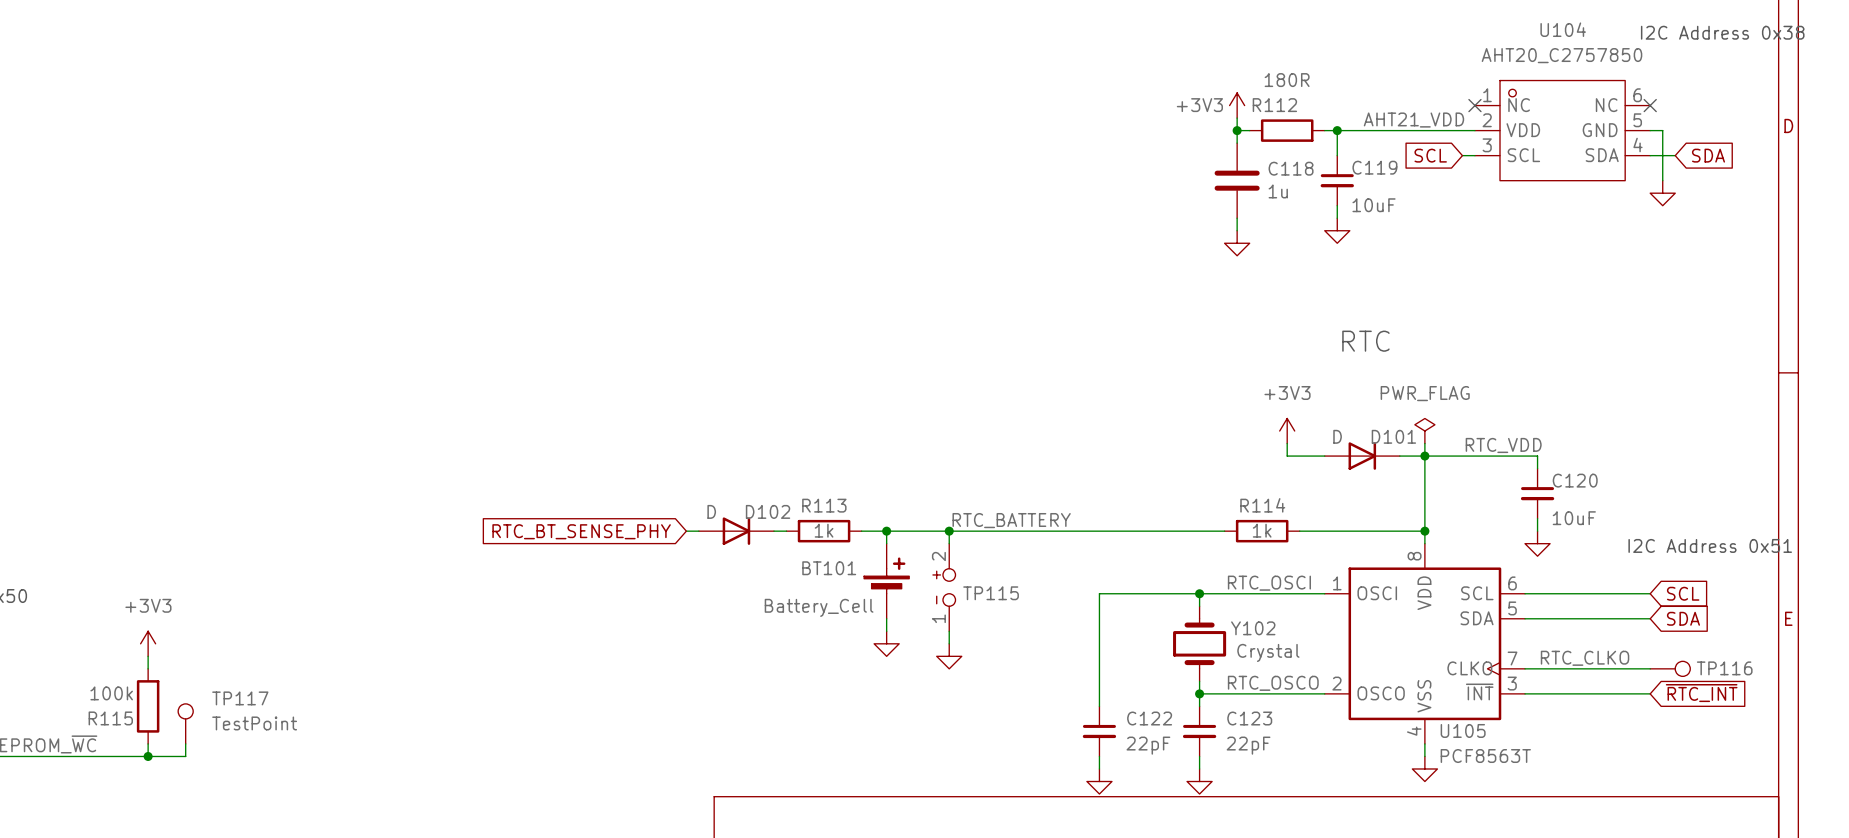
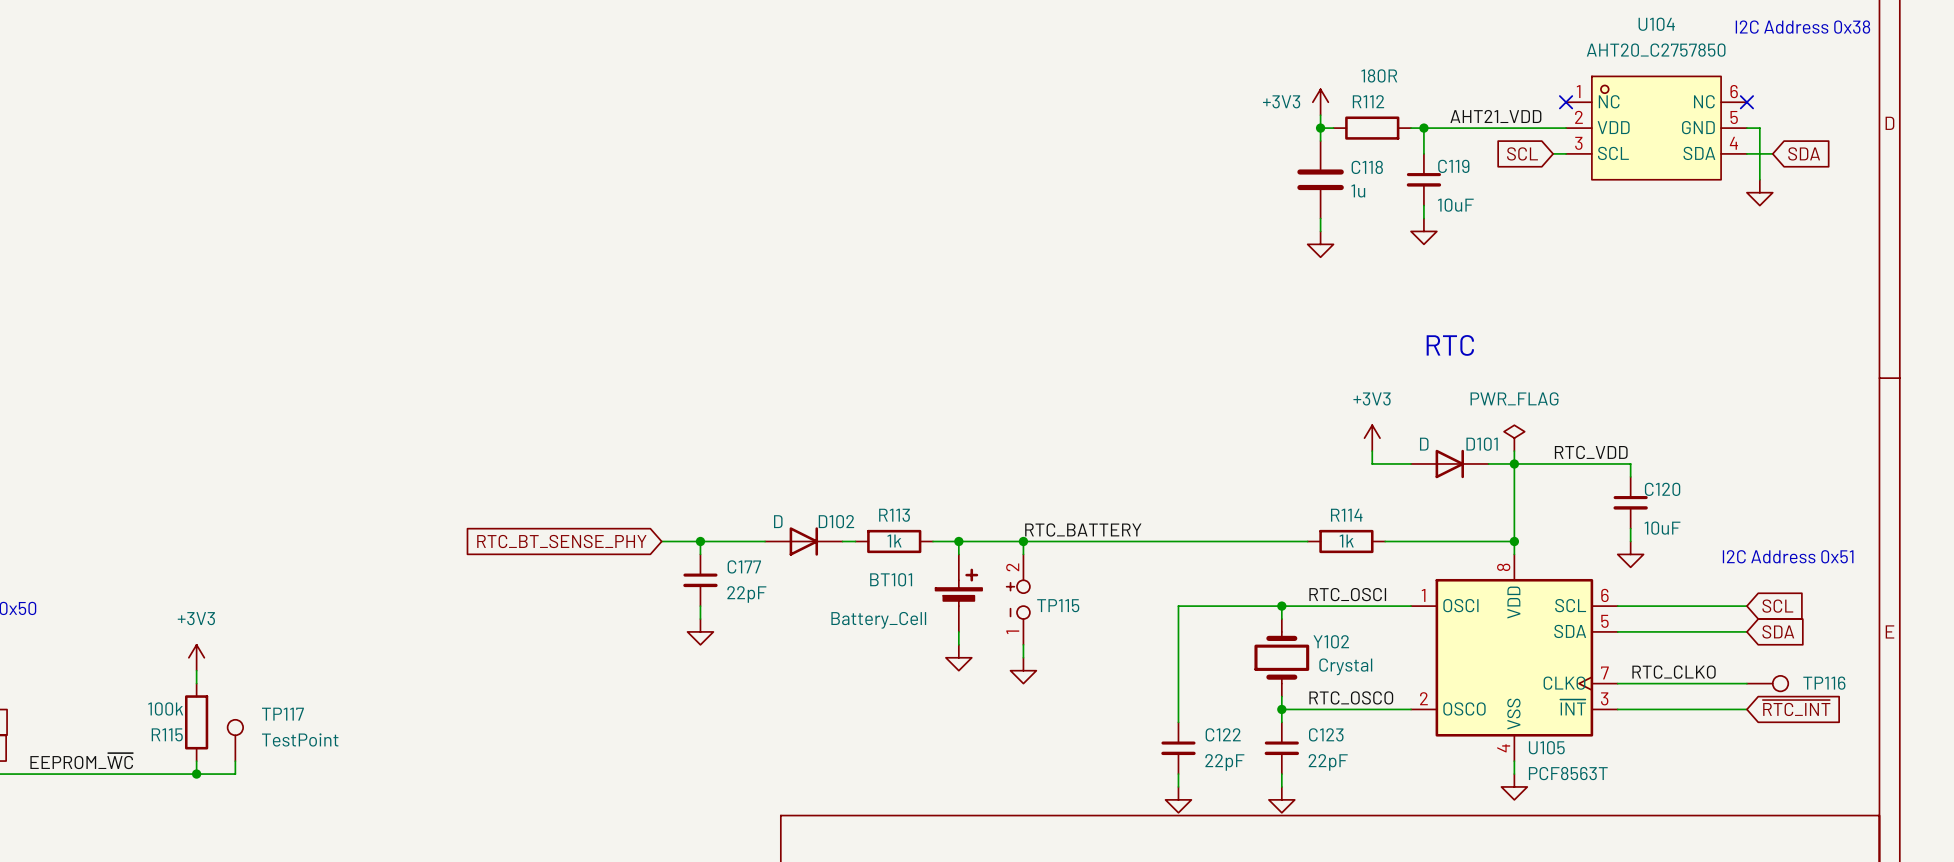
global label position: RTC_BT_SENSE_PHY (581, 531) -> RTC_BT_SENSE_PHY (561, 541)
wire: none -> (661, 541) (752, 541)
wire: none -> (700, 541) (700, 554)
junction: none -> (700, 541)
C177: none -> 22pF (700, 580)
wire: none -> (700, 606) (700, 619)
power symbol: none -> (700, 631)

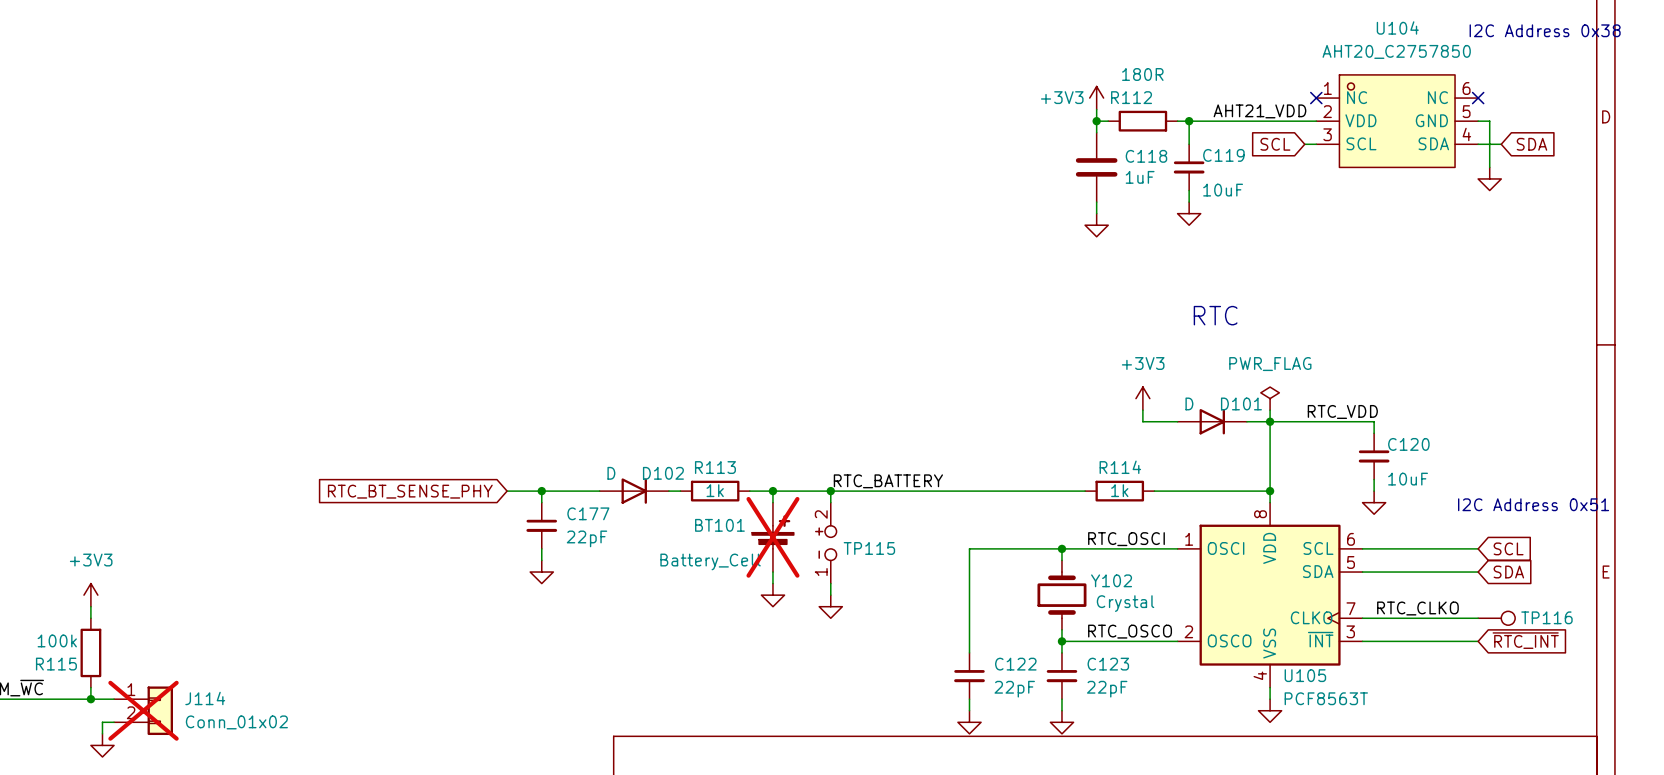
C118 value: 1u (1358, 190) -> 1uF (1140, 177)
BT101 do-not-place cross: none -> (772, 537)
TP117: TestPoint (235, 740) -> none
J114: none -> Conn_01x02 (143, 710)
wire: none -> (114, 722) (102, 722) (102, 733)
power symbol: none -> (102, 745)

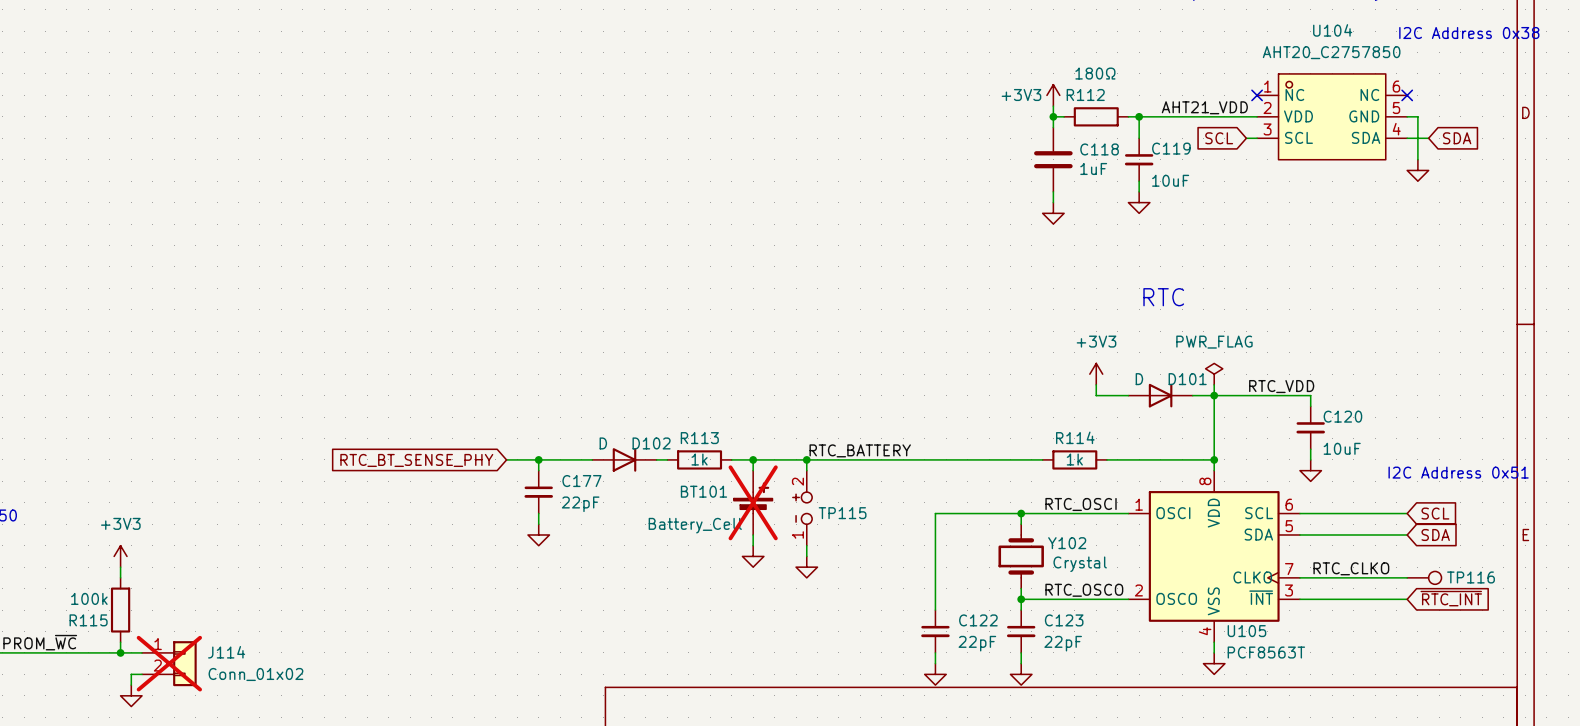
R112 value: 180R (1142, 74) -> 180Ω (1095, 73)

